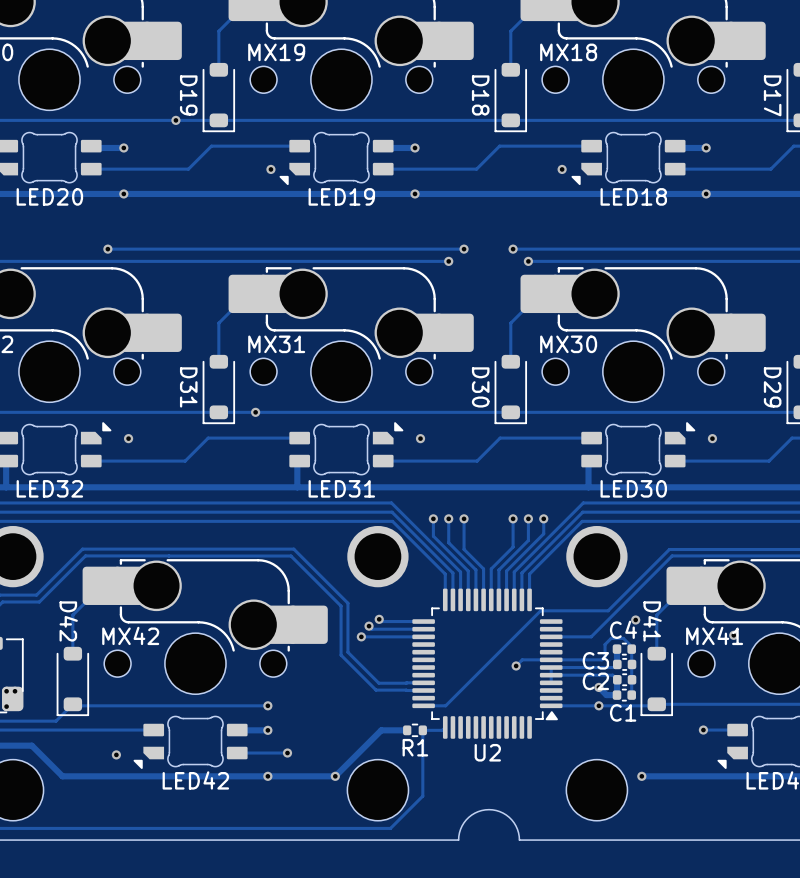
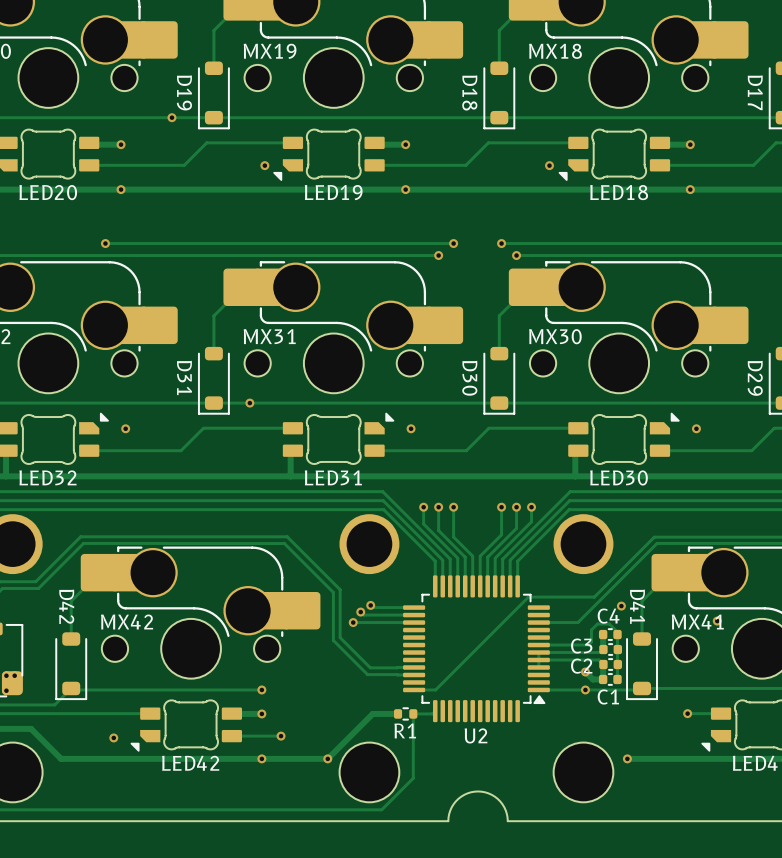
track: (551, 659) (522, 659) (516, 665) -> none
via: (516, 665) -> none

